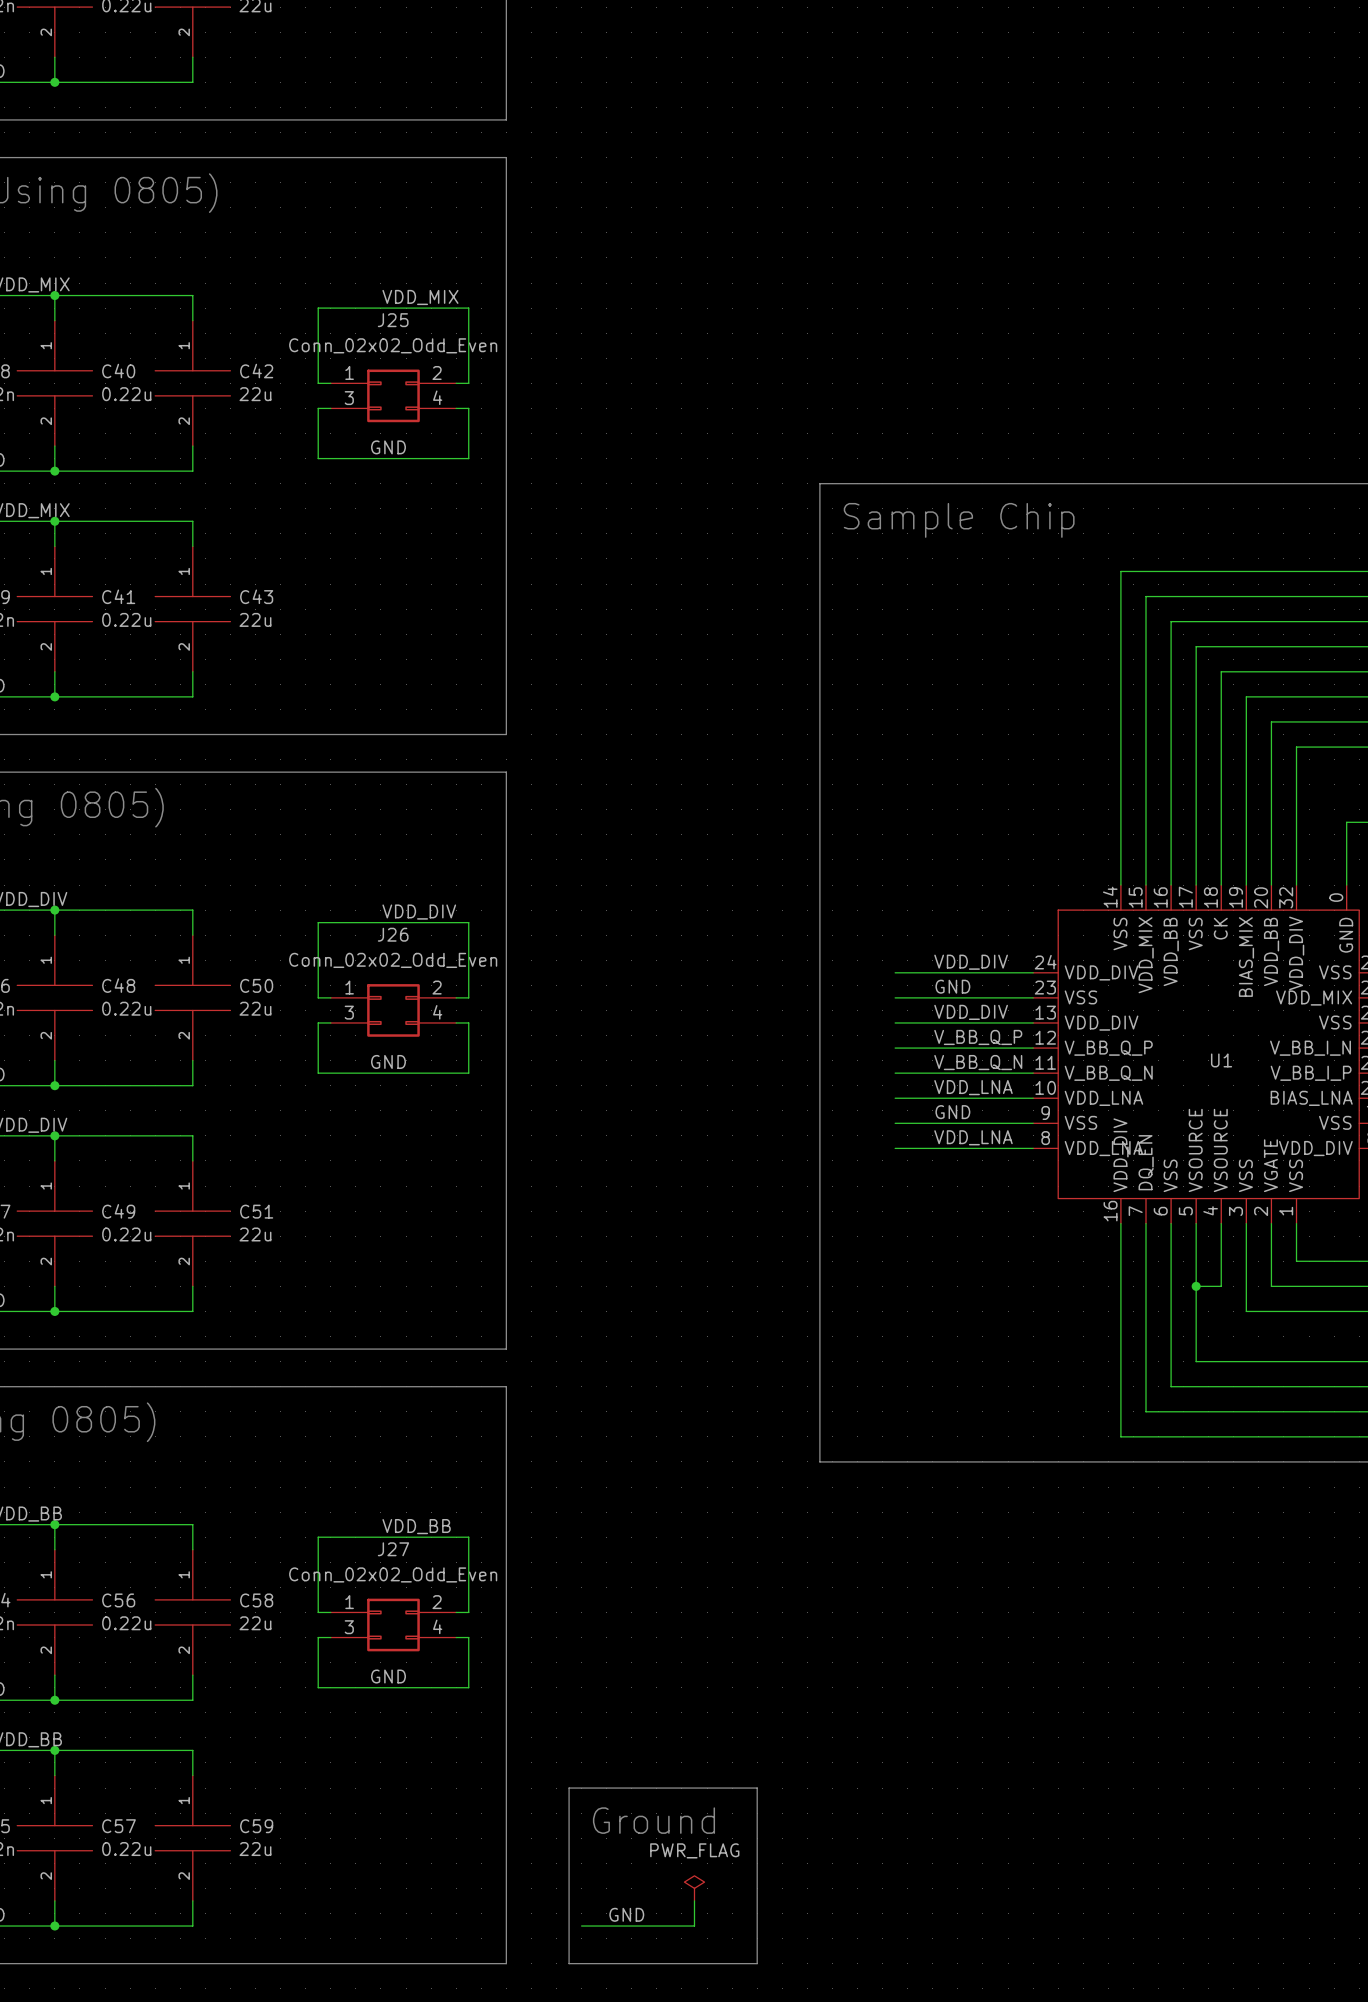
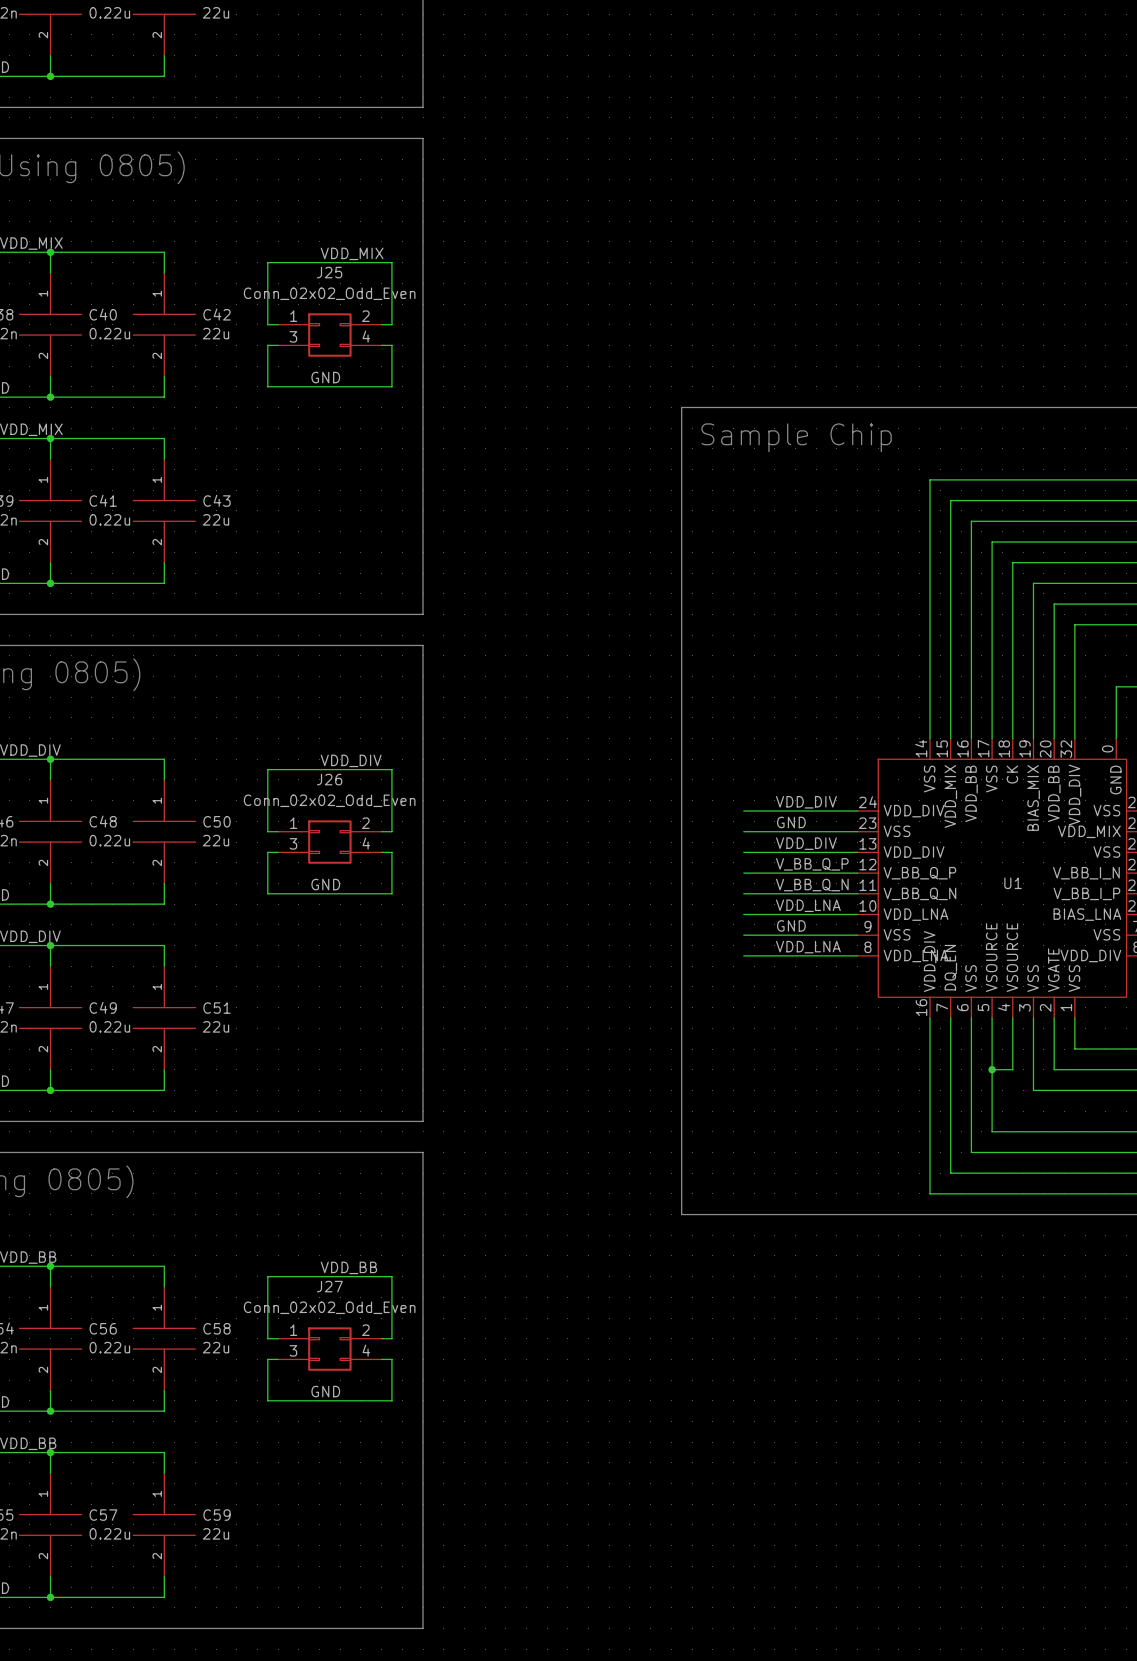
line: (569, 1788) (757, 1788) (757, 1963) (569, 1963) (569, 1788) -> none
text: Ground (653, 1820) -> none
power symbol: PWR_FLAG (694, 1888) -> none
wire: (694, 1900) (694, 1926) (581, 1926) -> none
label: GND (626, 1914) -> none

